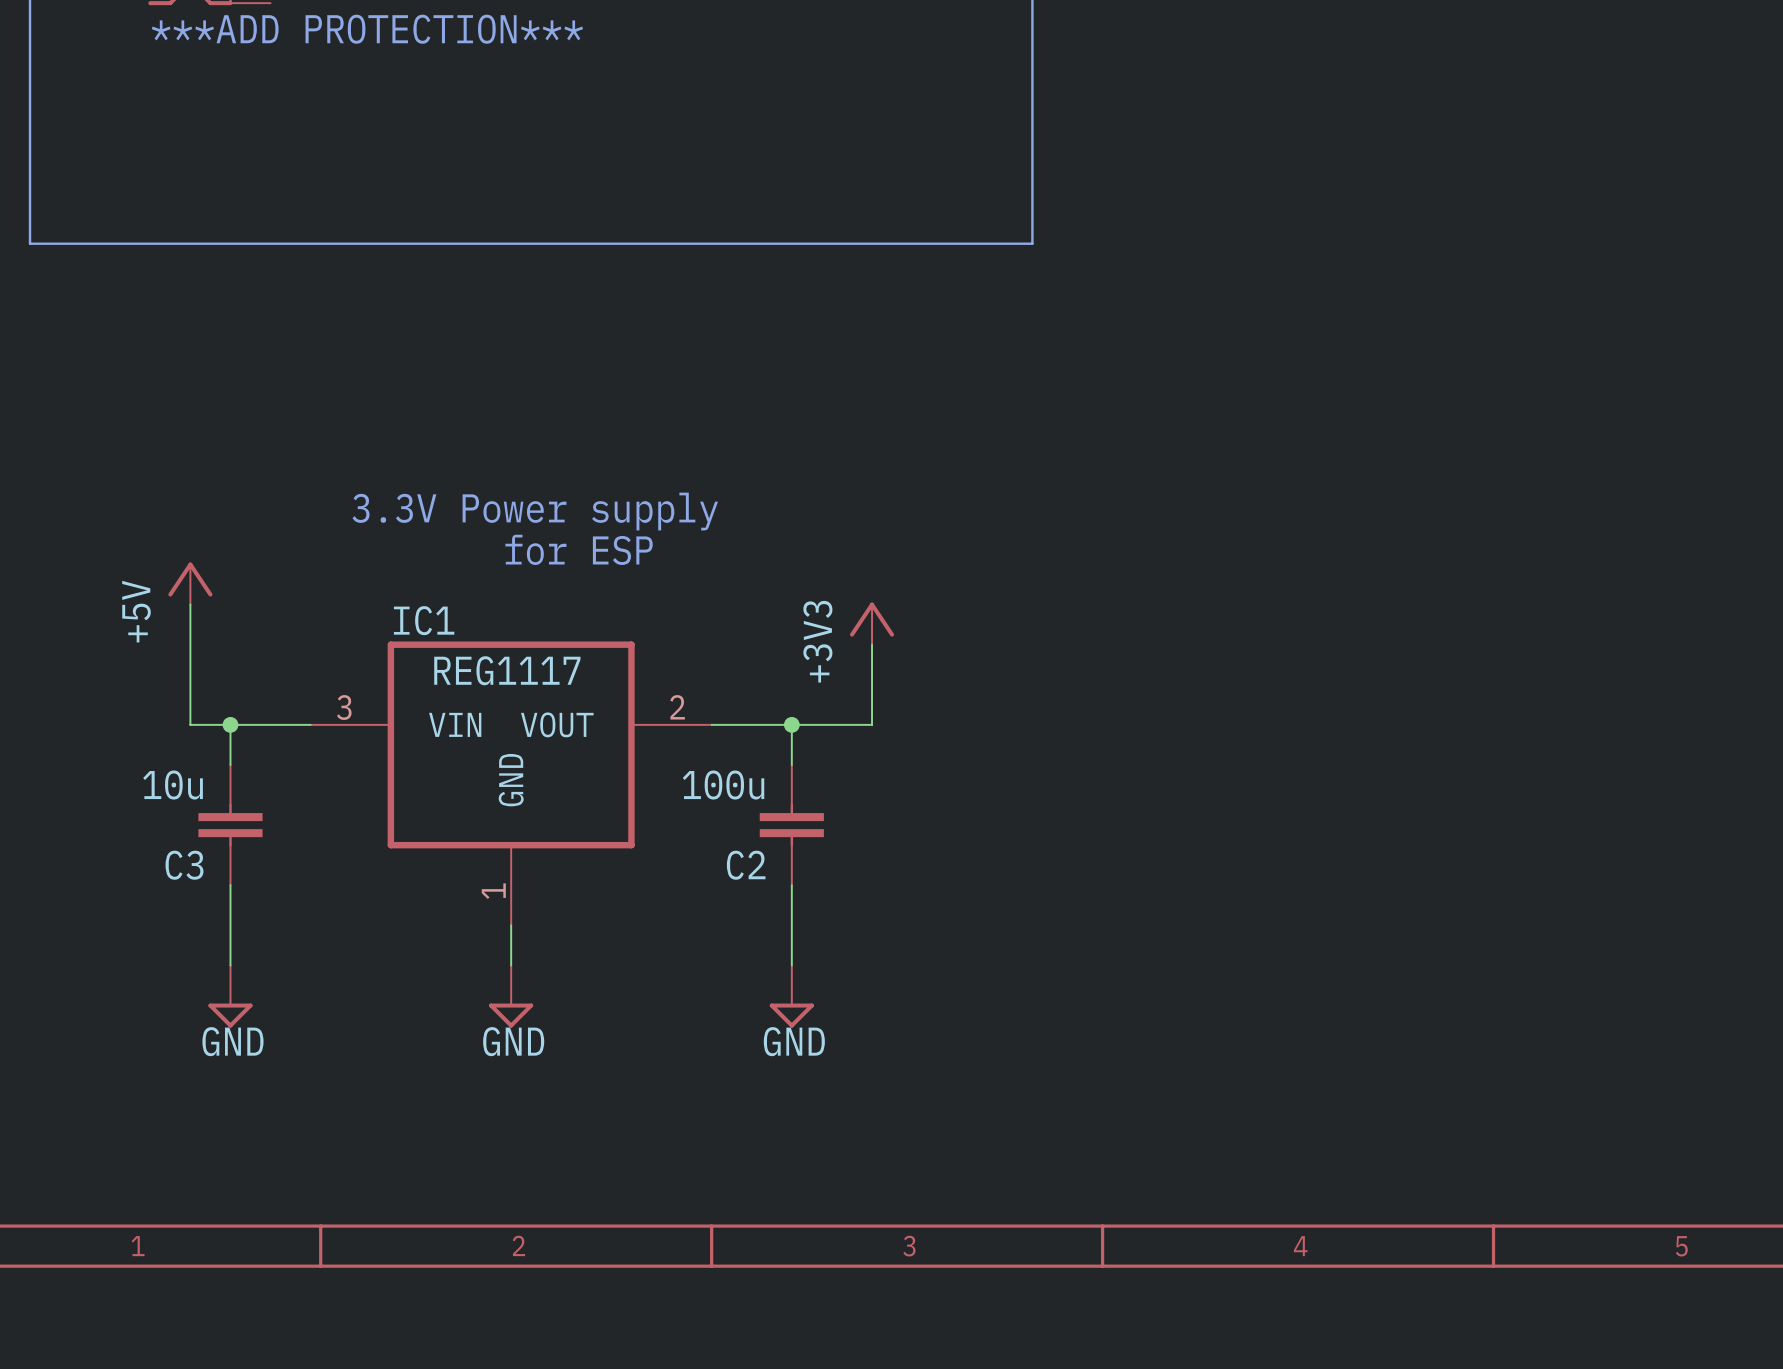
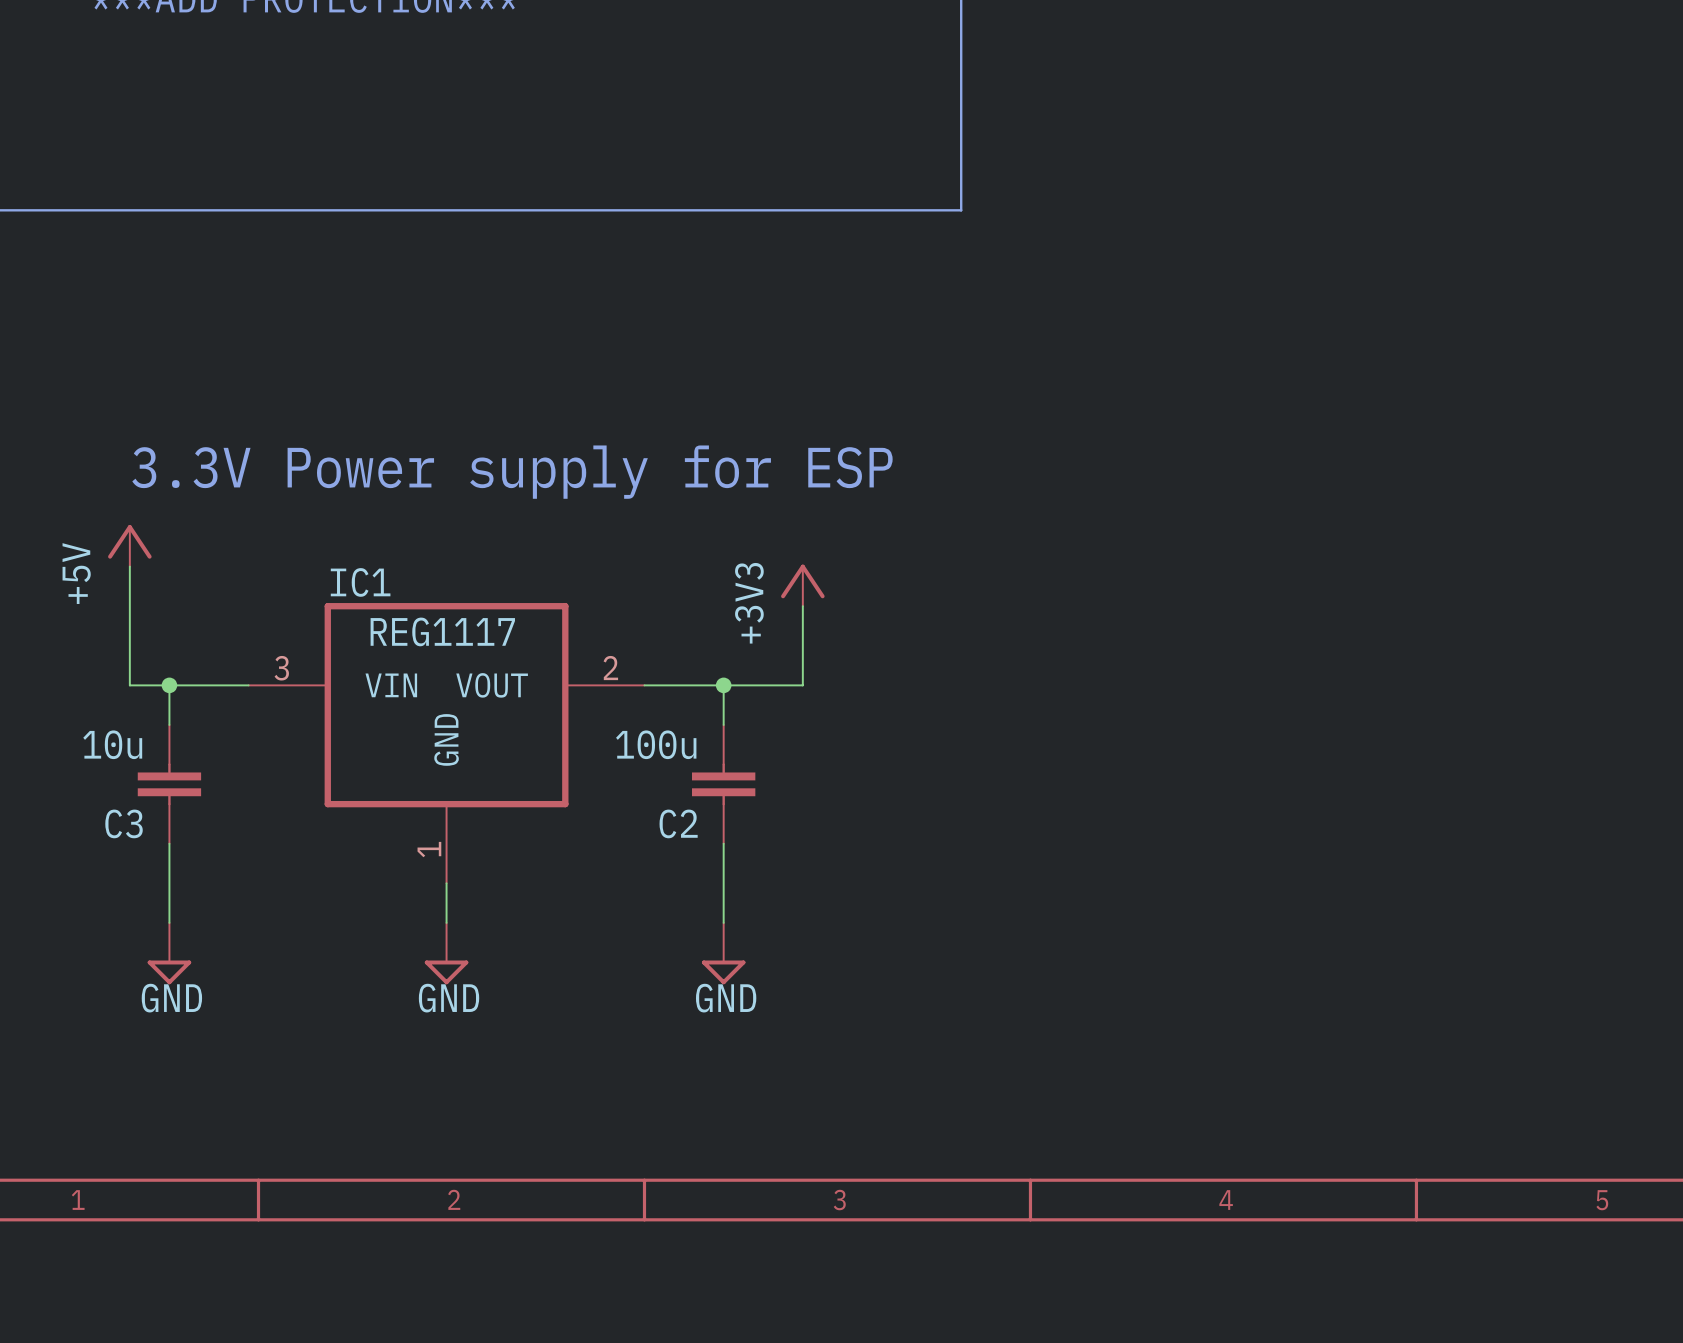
text: 3.3V Power supply (535, 511) -> 3.3V Power supply for ESP (512, 472)
text: for ESP (579, 549) -> none

